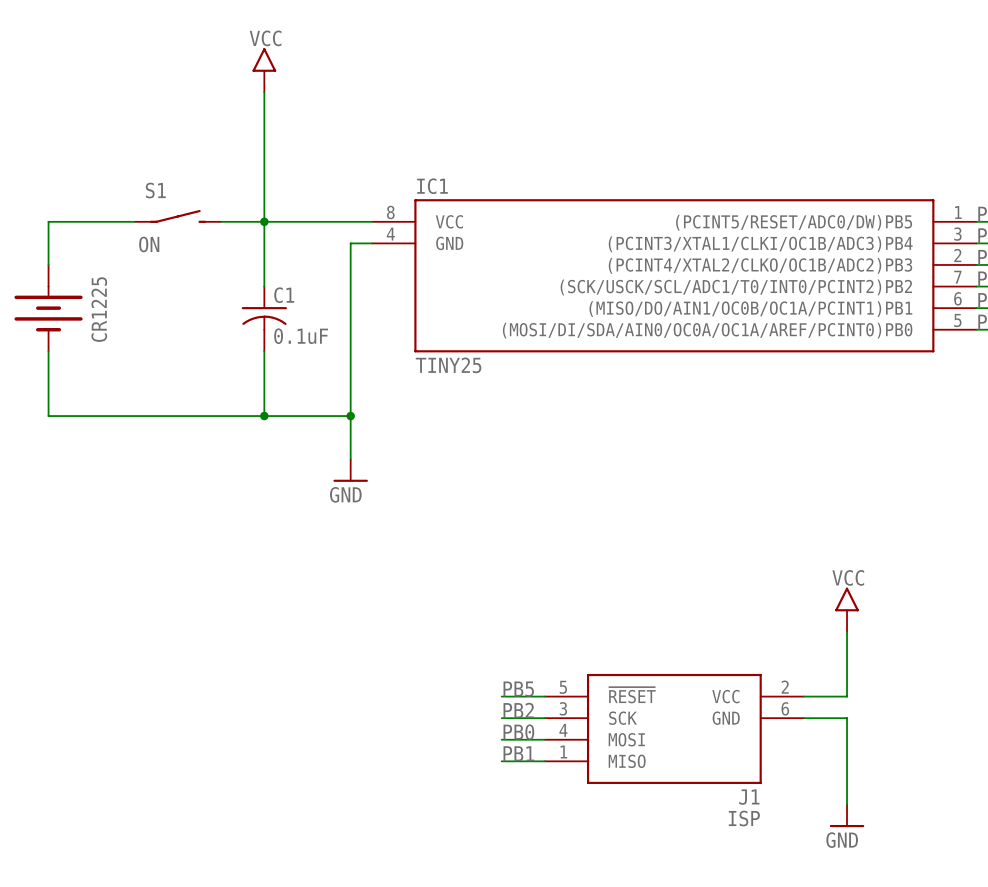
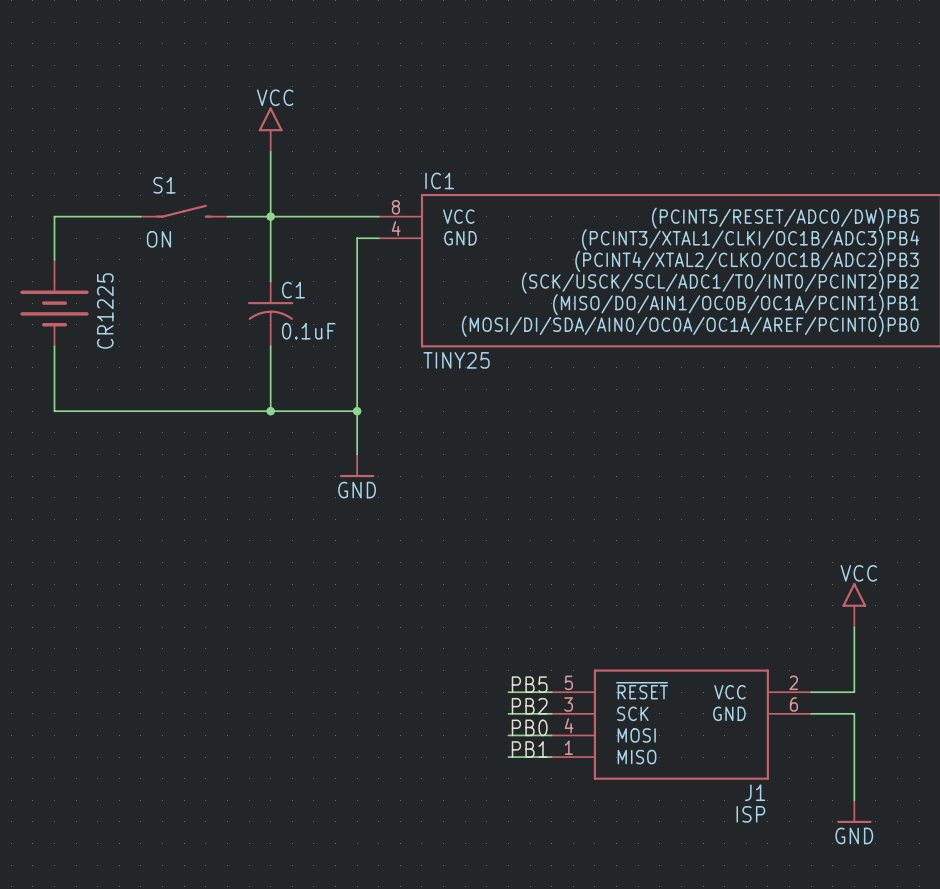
power symbol position: (264, 70) -> (270, 129)
wire: (264, 92) (264, 157) -> none

